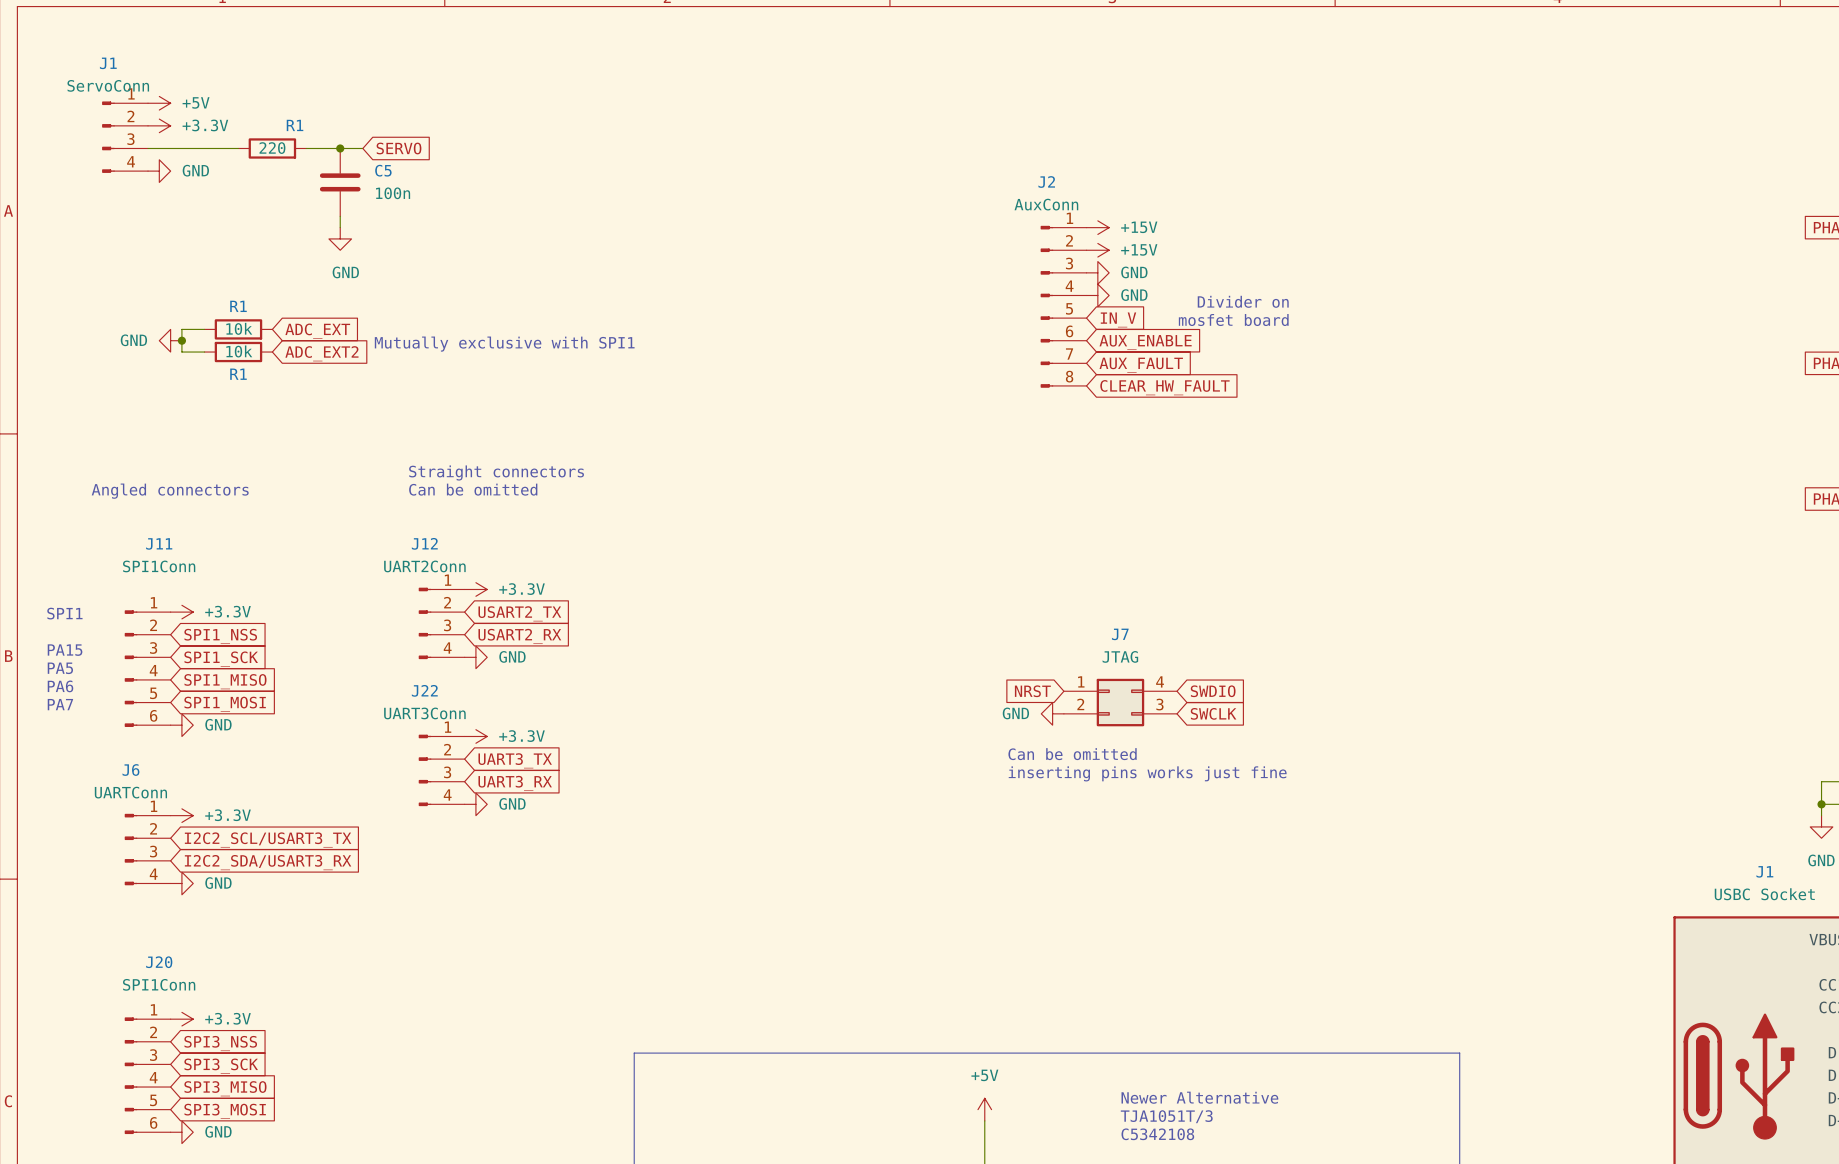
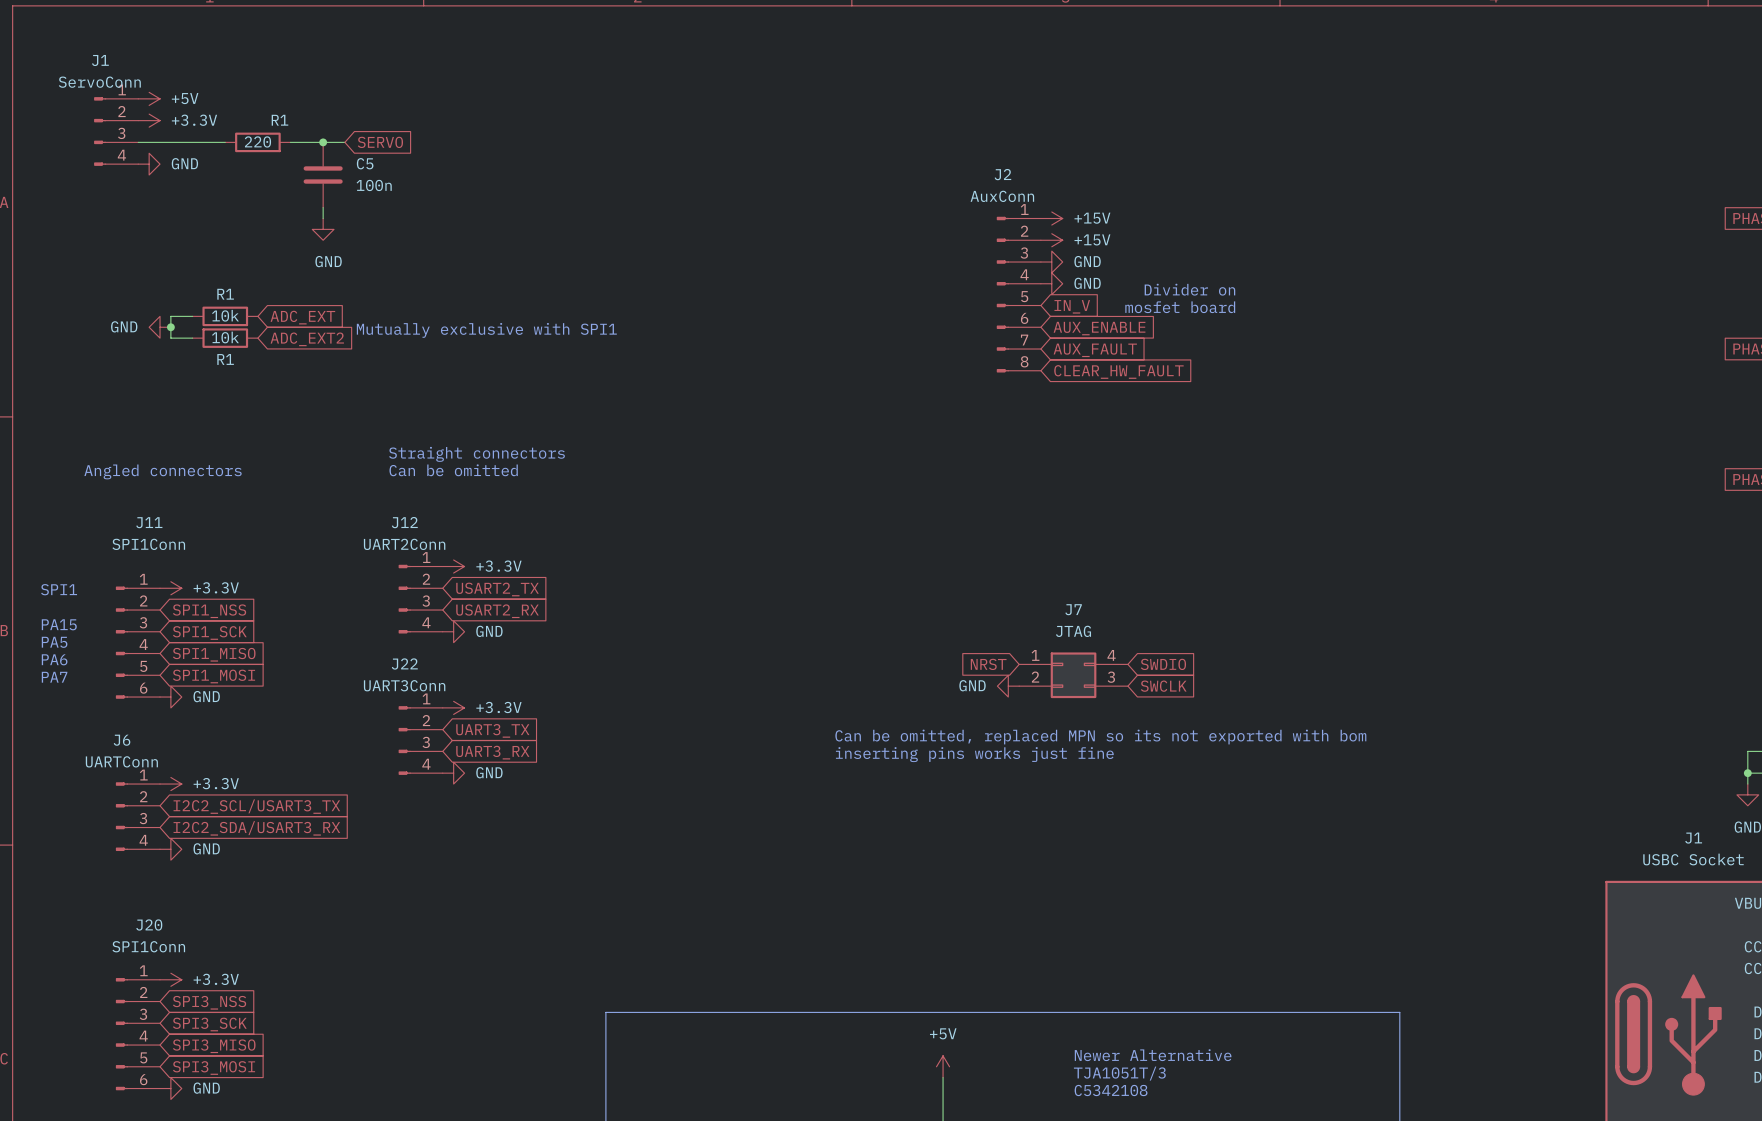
text: Can be omitted (1072, 754) -> none
text: none -> Can be omitted, replaced MPN so its not exported with bom (1100, 737)
text position: inserting pins works just fine (1147, 773) -> inserting pins works just fine (974, 754)

